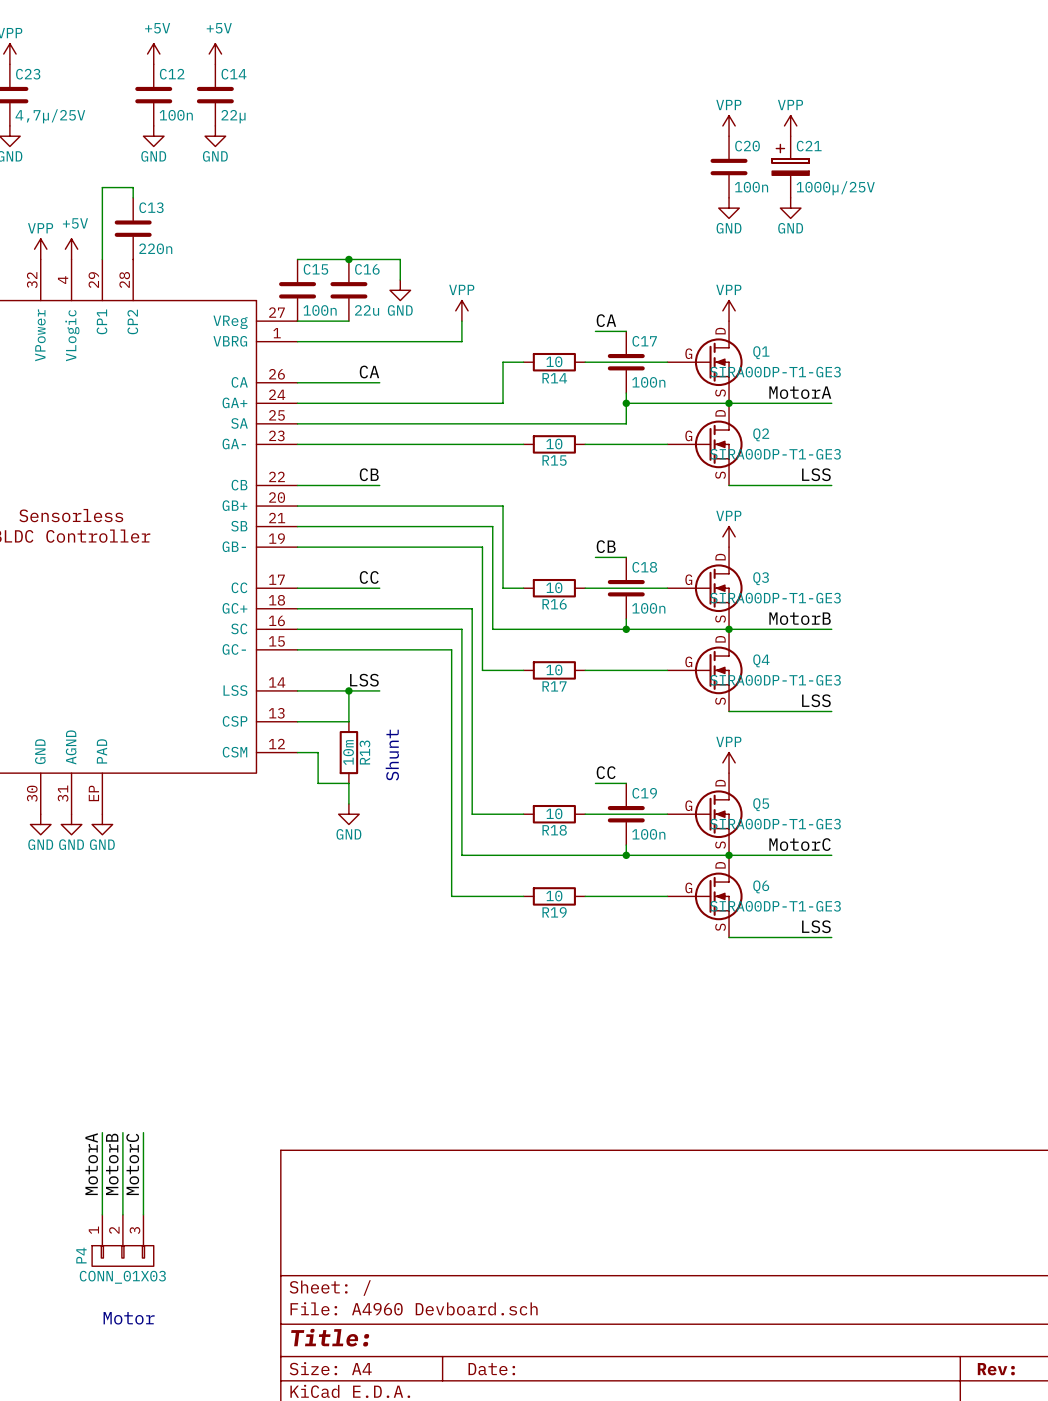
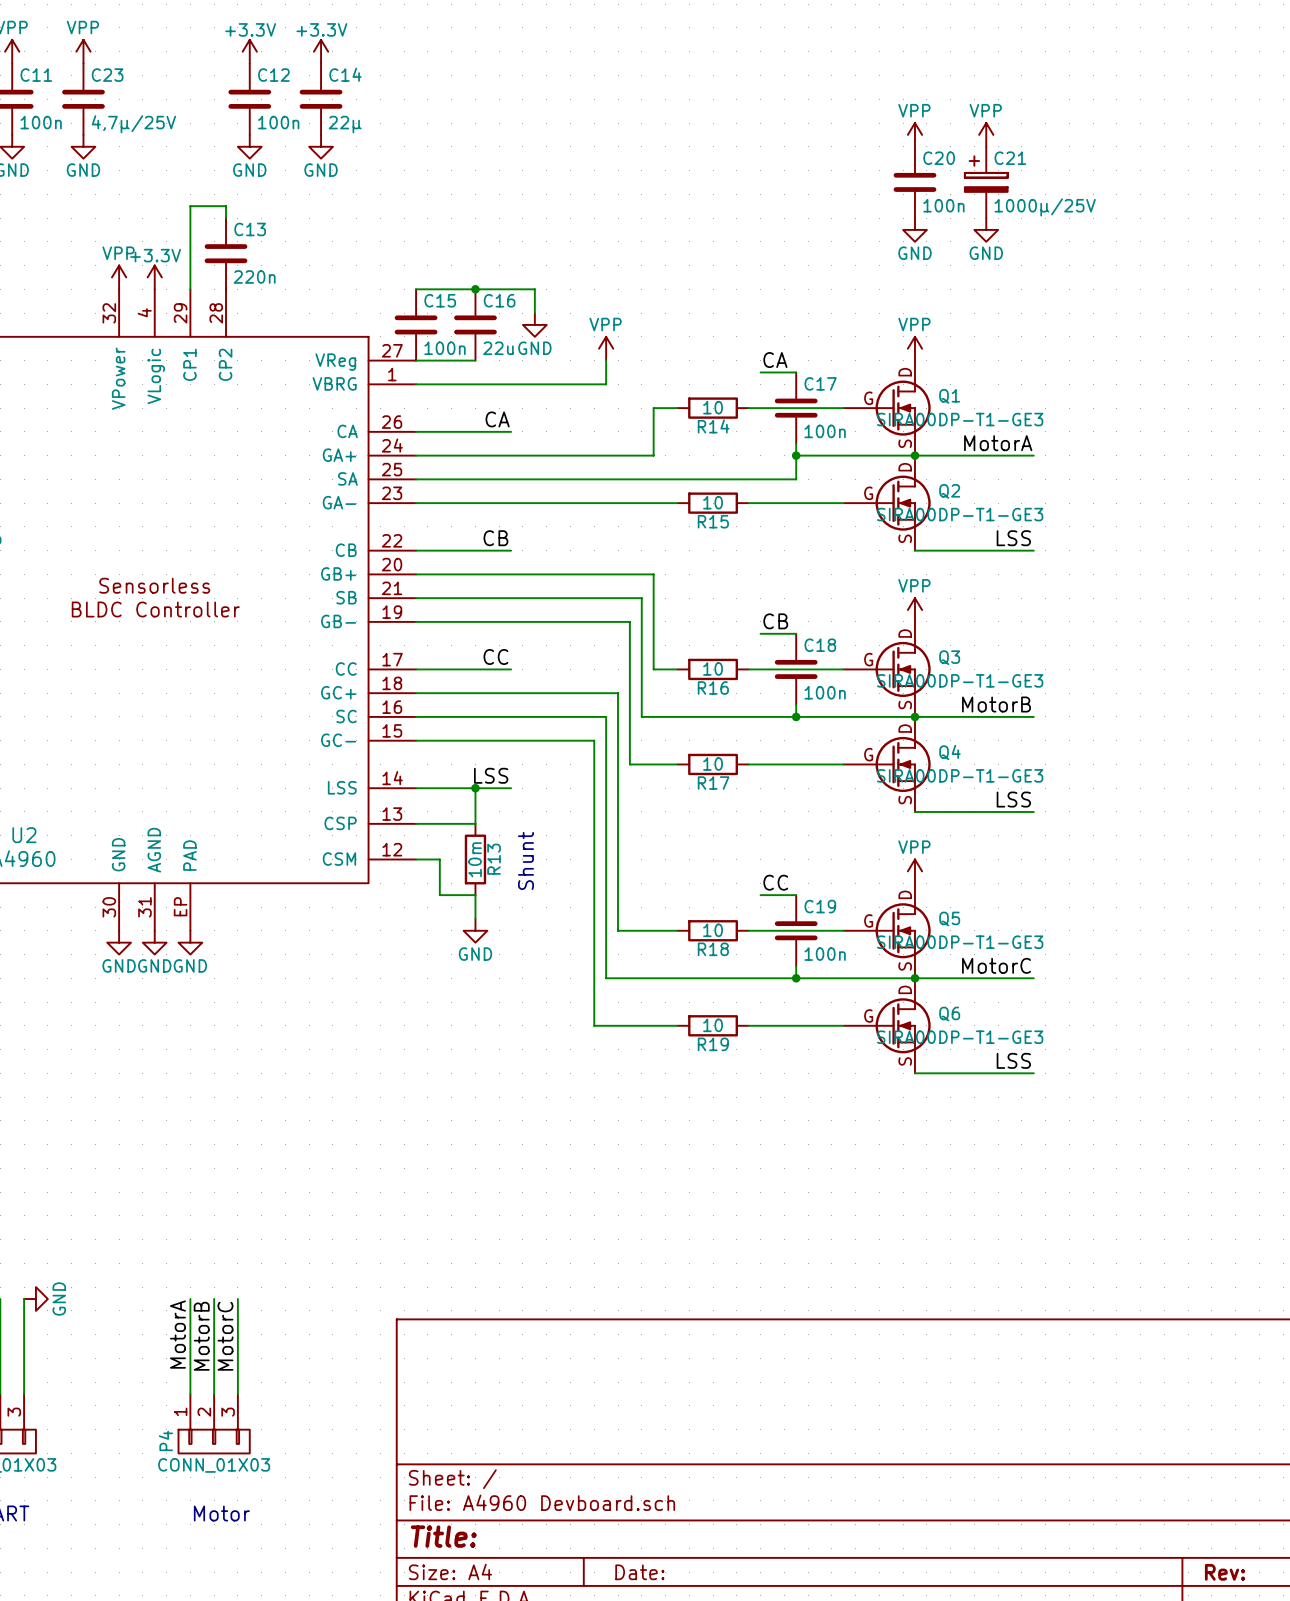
power symbol: +5V (153, 54) -> +3.3V (249, 51)
power symbol: +5V (215, 54) -> +3.3V (321, 51)
power symbol: +5V (71, 249) -> +3.3V (154, 277)

